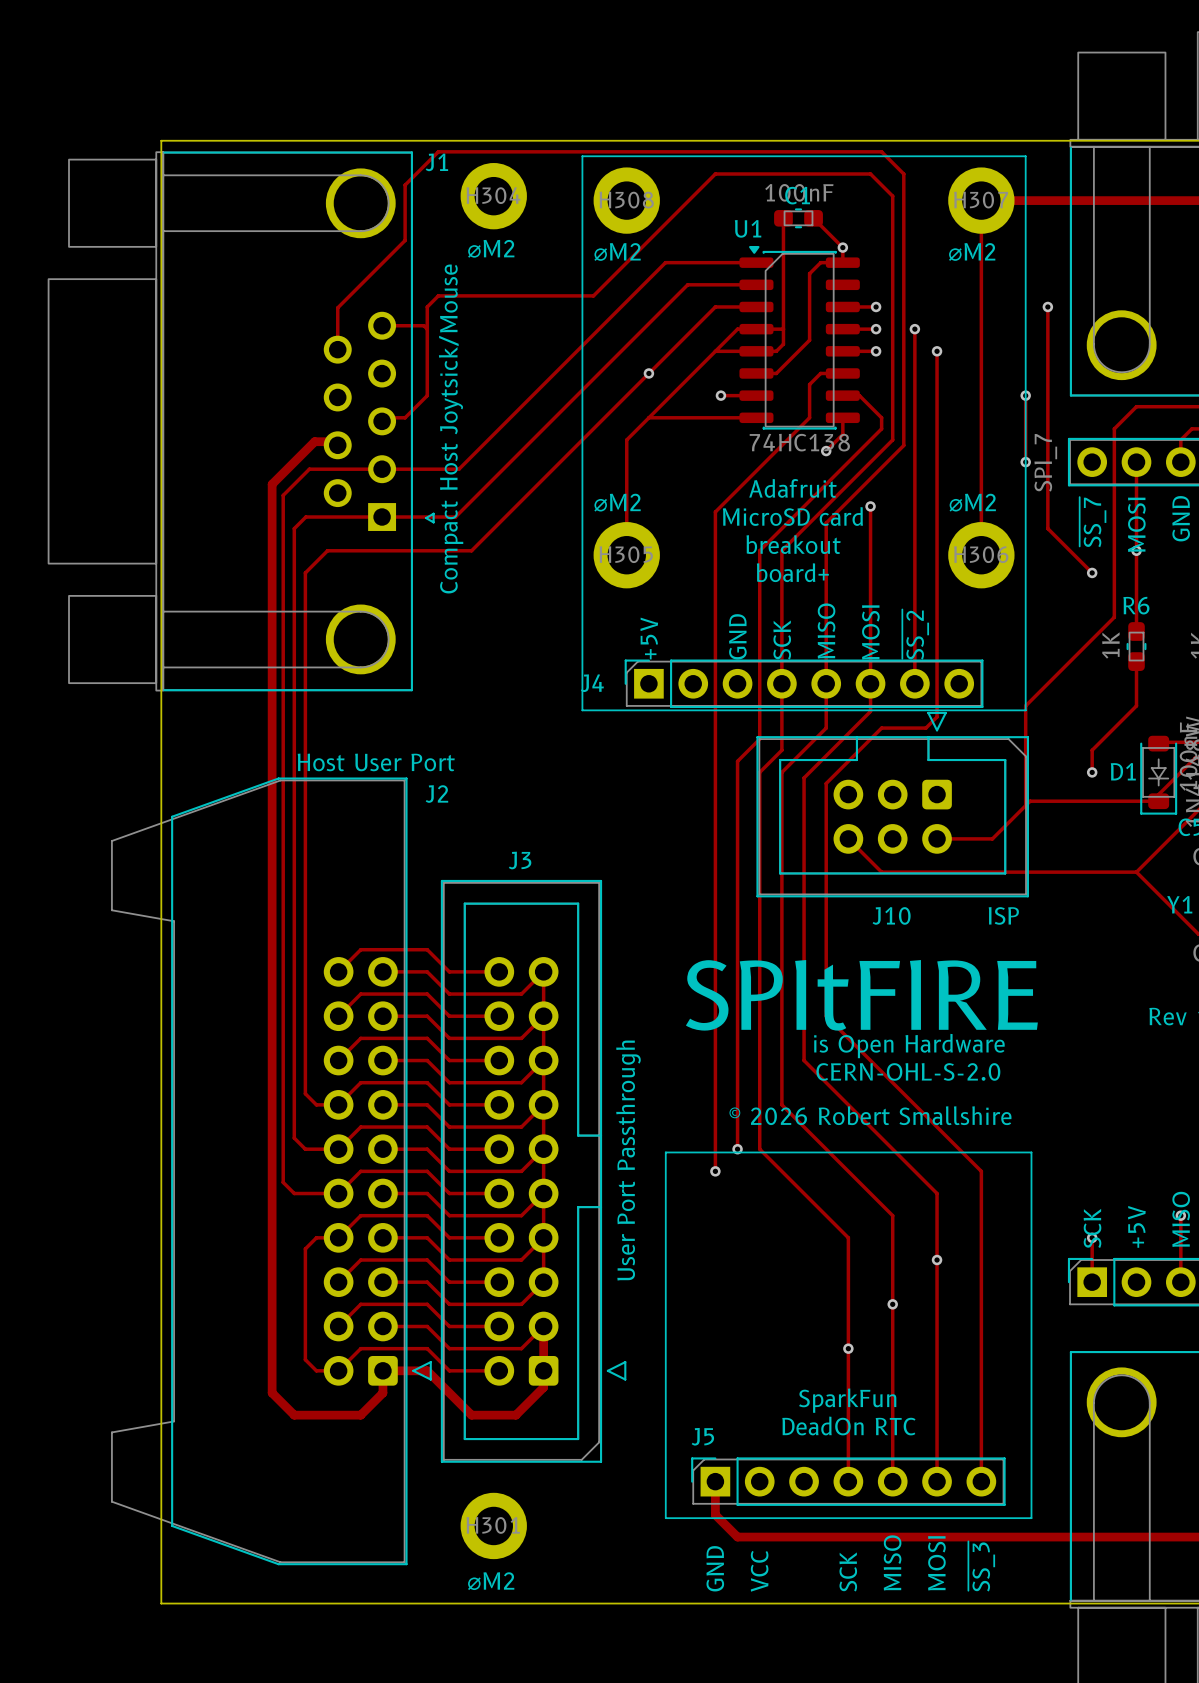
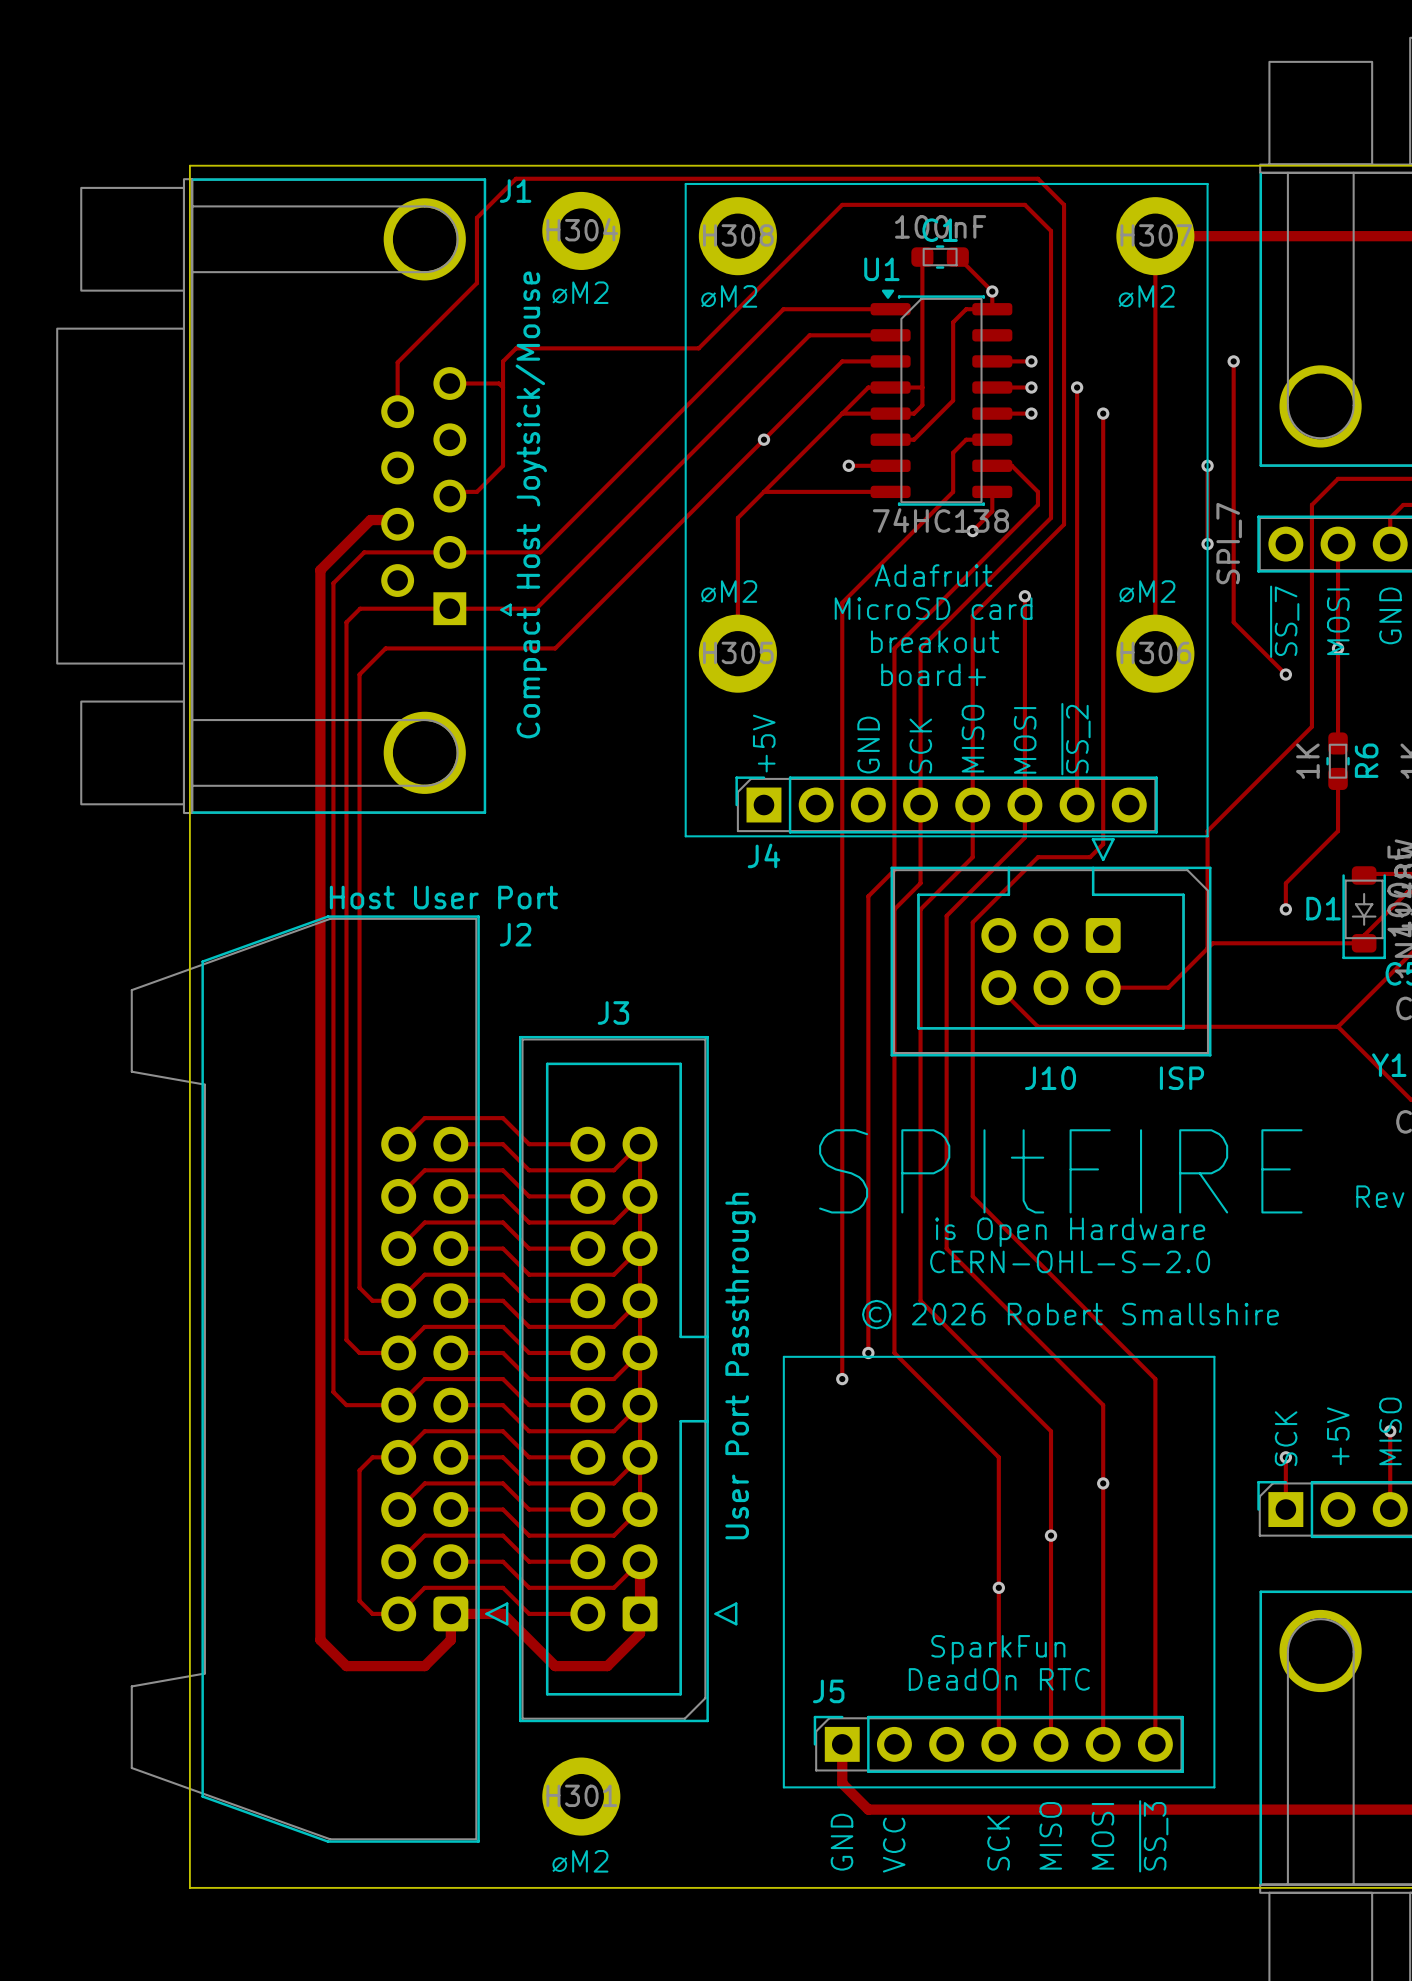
R6 name rotation: 0° (1136, 605) -> 90° counterclockwise (1366, 760)
R6 name position: R6 (1136, 605) -> R6 (1366, 760)
J4 name position: J4 (592, 683) -> J4 (763, 855)

